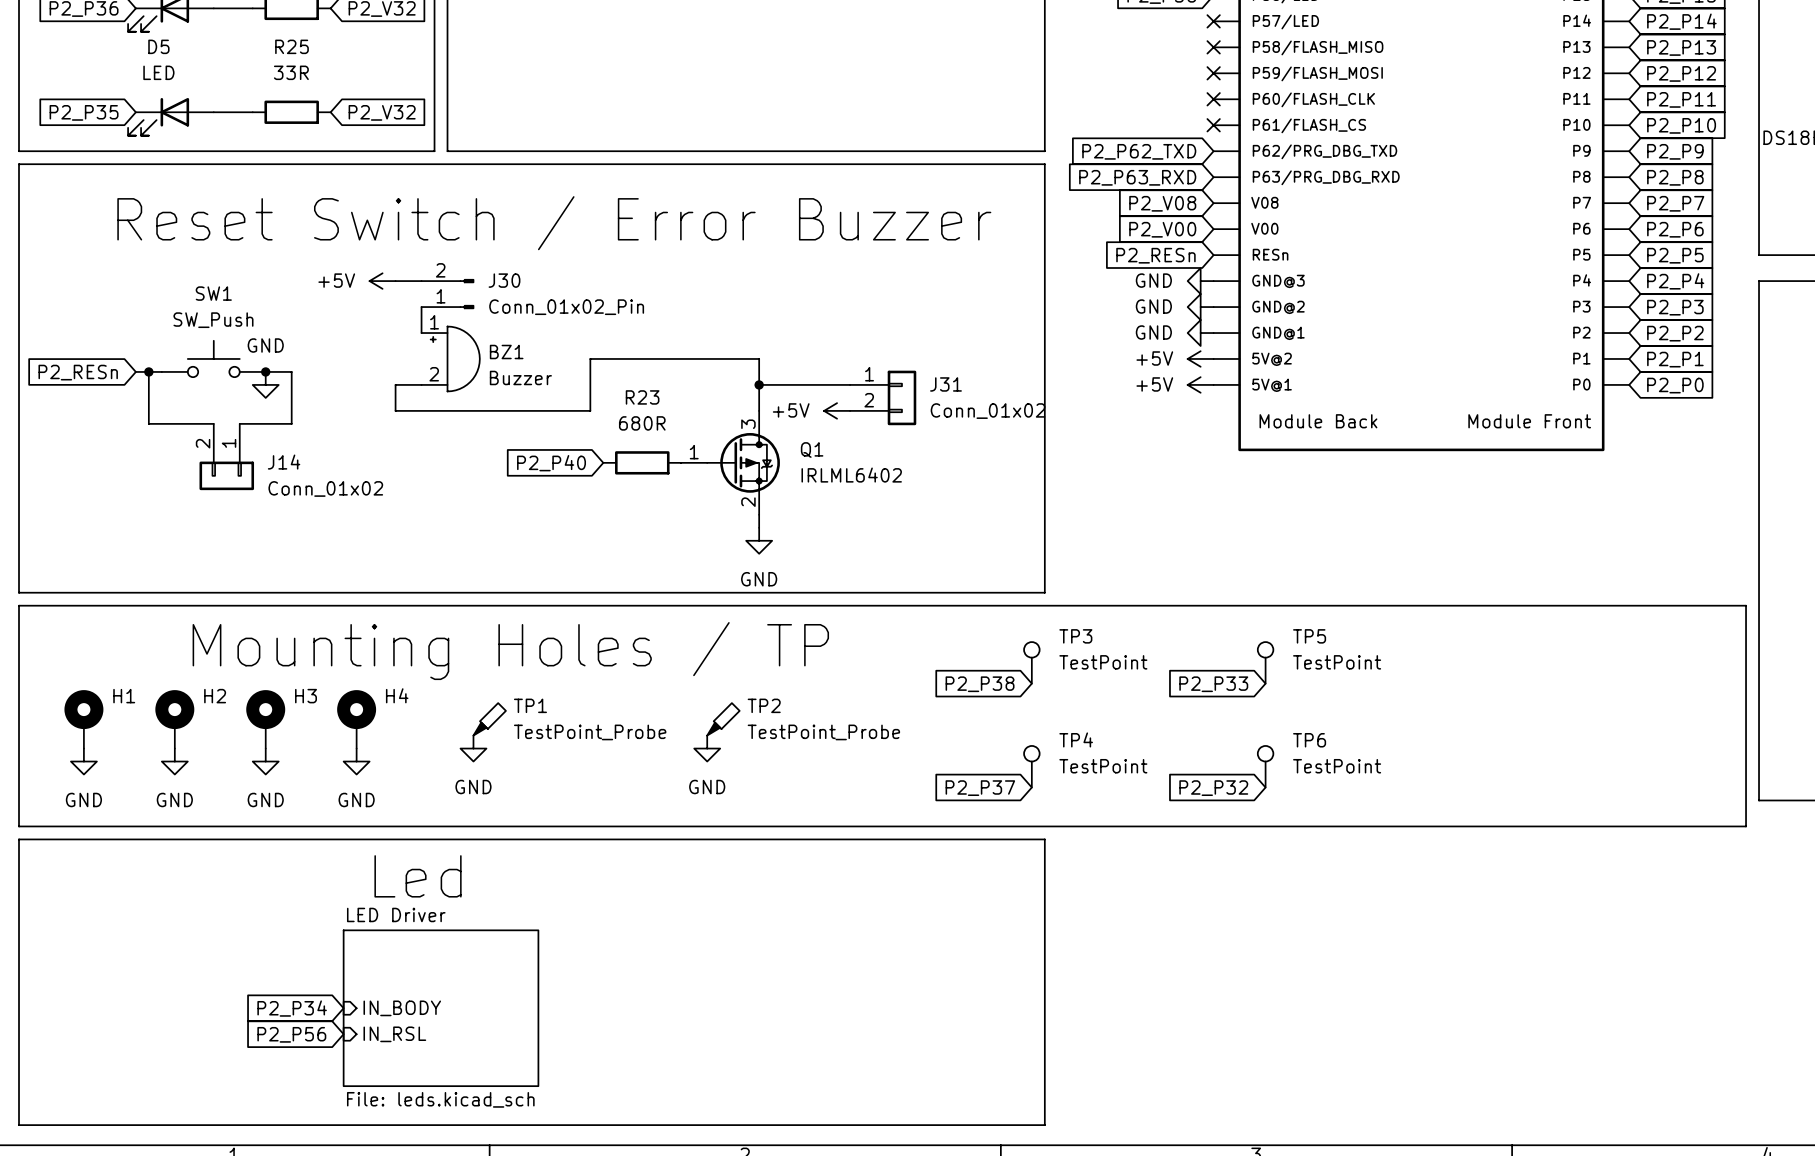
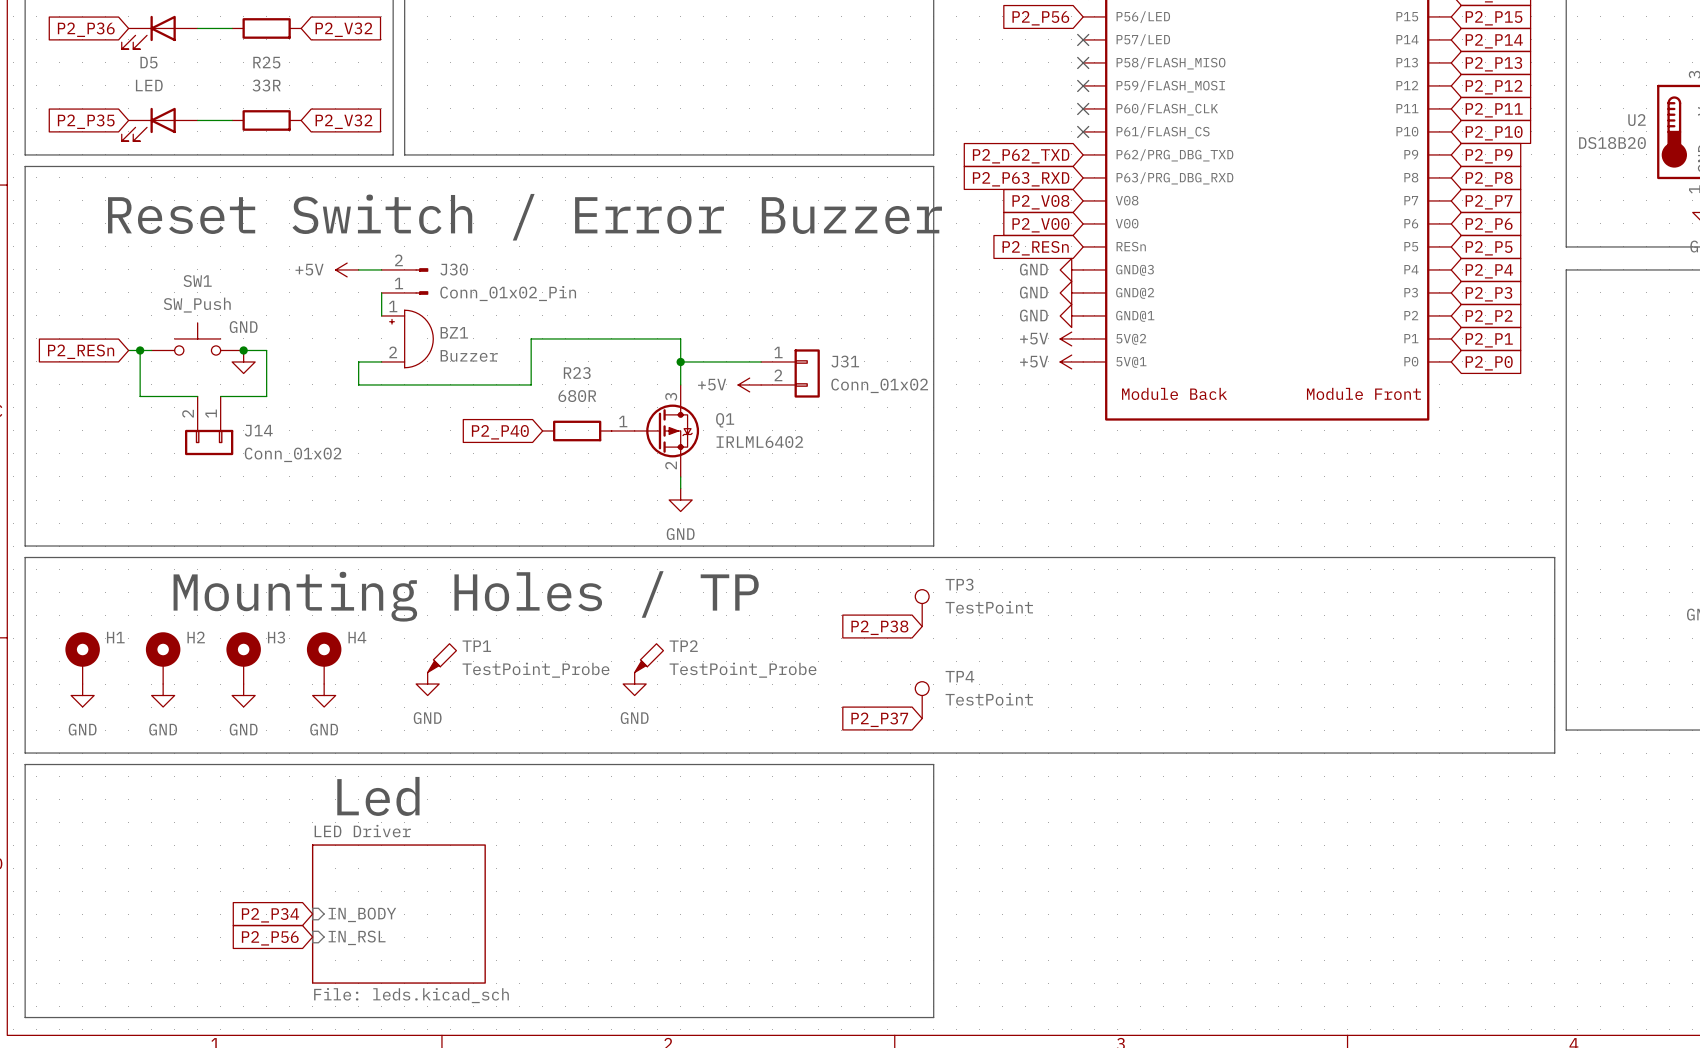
TP5: TestPoint (1265, 662) -> none
global label: P2_P33 (1213, 684) -> none
TP6: TestPoint (1265, 766) -> none
global label: P2_P32 (1213, 788) -> none

